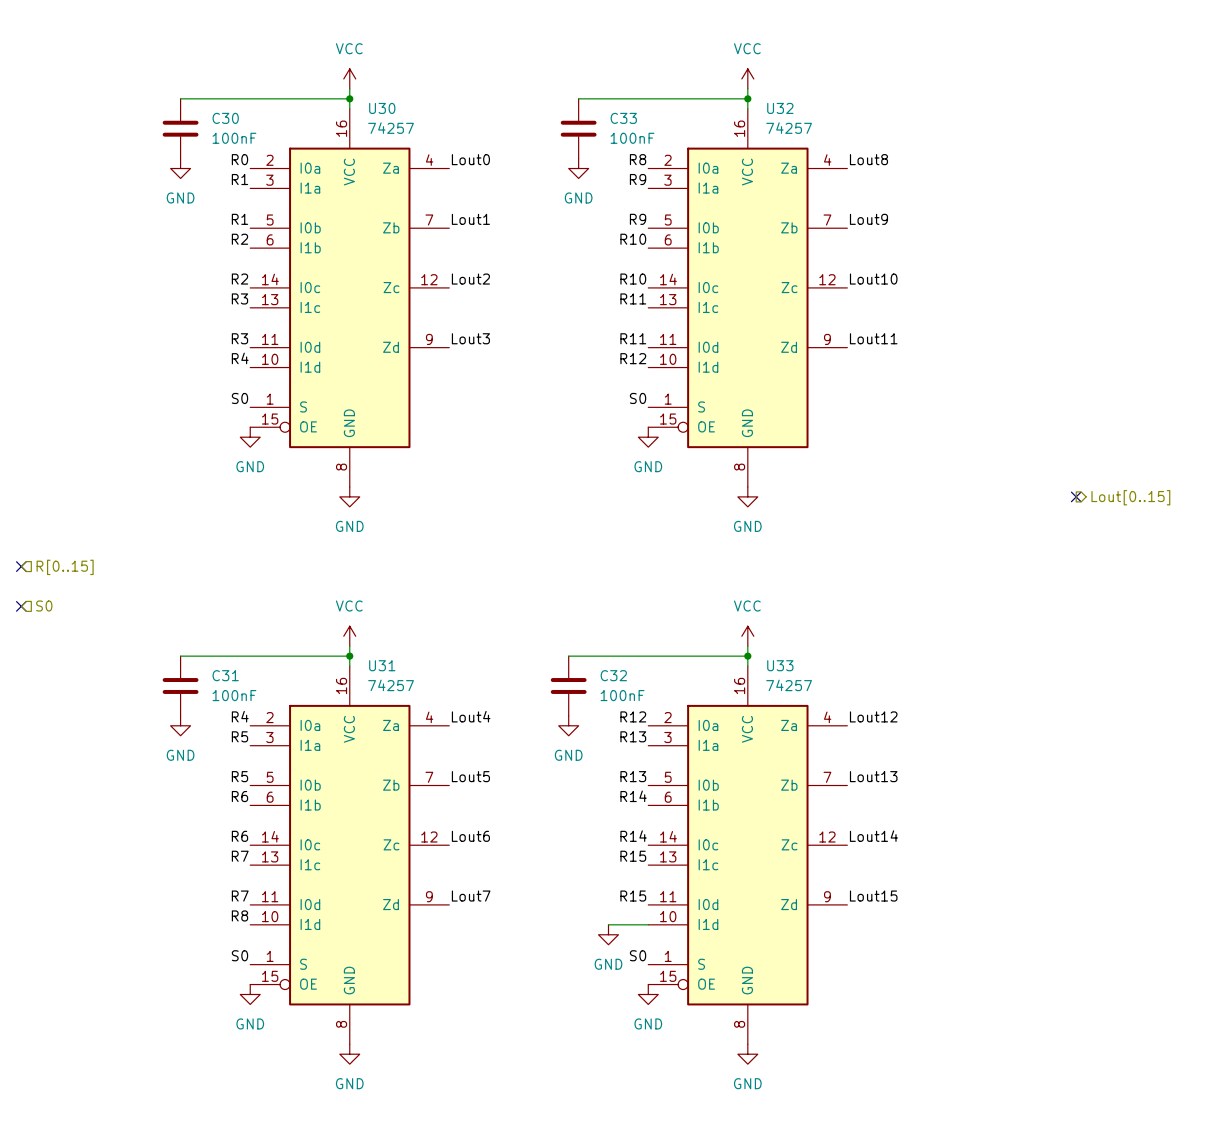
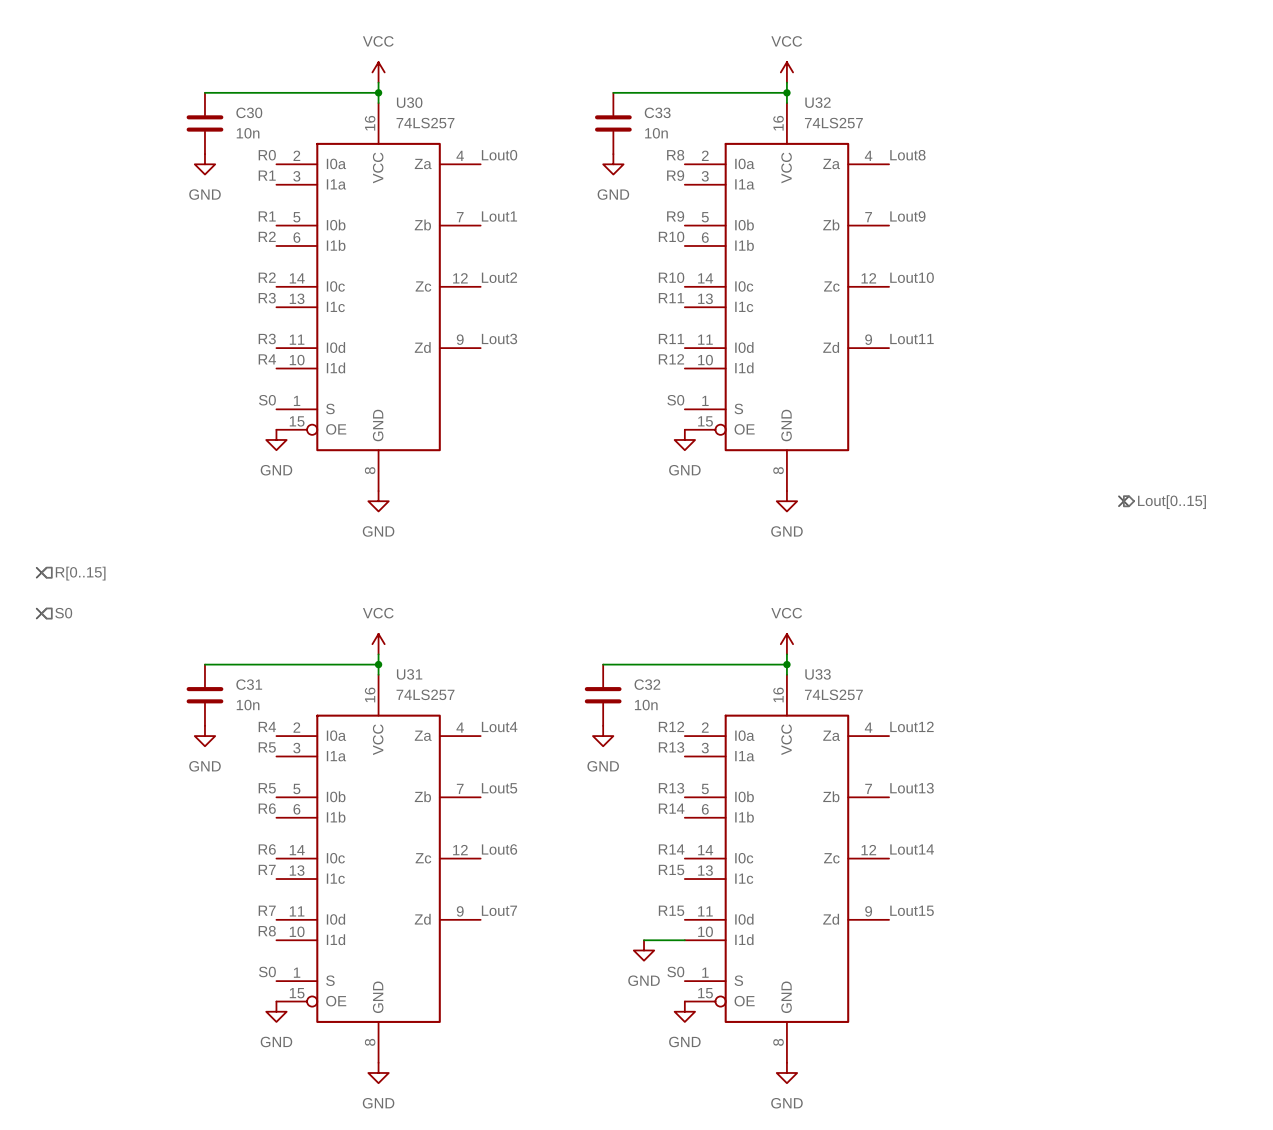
U30 value: 74257 (391, 128) -> 74LS257 (425, 123)
U32 value: 74257 (789, 128) -> 74LS257 (833, 123)
C30 value: 100nF (234, 138) -> 10n (248, 133)
C33 value: 100nF (632, 138) -> 10n (656, 133)
U31 value: 74257 (391, 685) -> 74LS257 (425, 694)
U33 value: 74257 (789, 685) -> 74LS257 (833, 694)
C31 value: 100nF (234, 695) -> 10n (248, 705)
C32 value: 100nF (622, 695) -> 10n (646, 705)

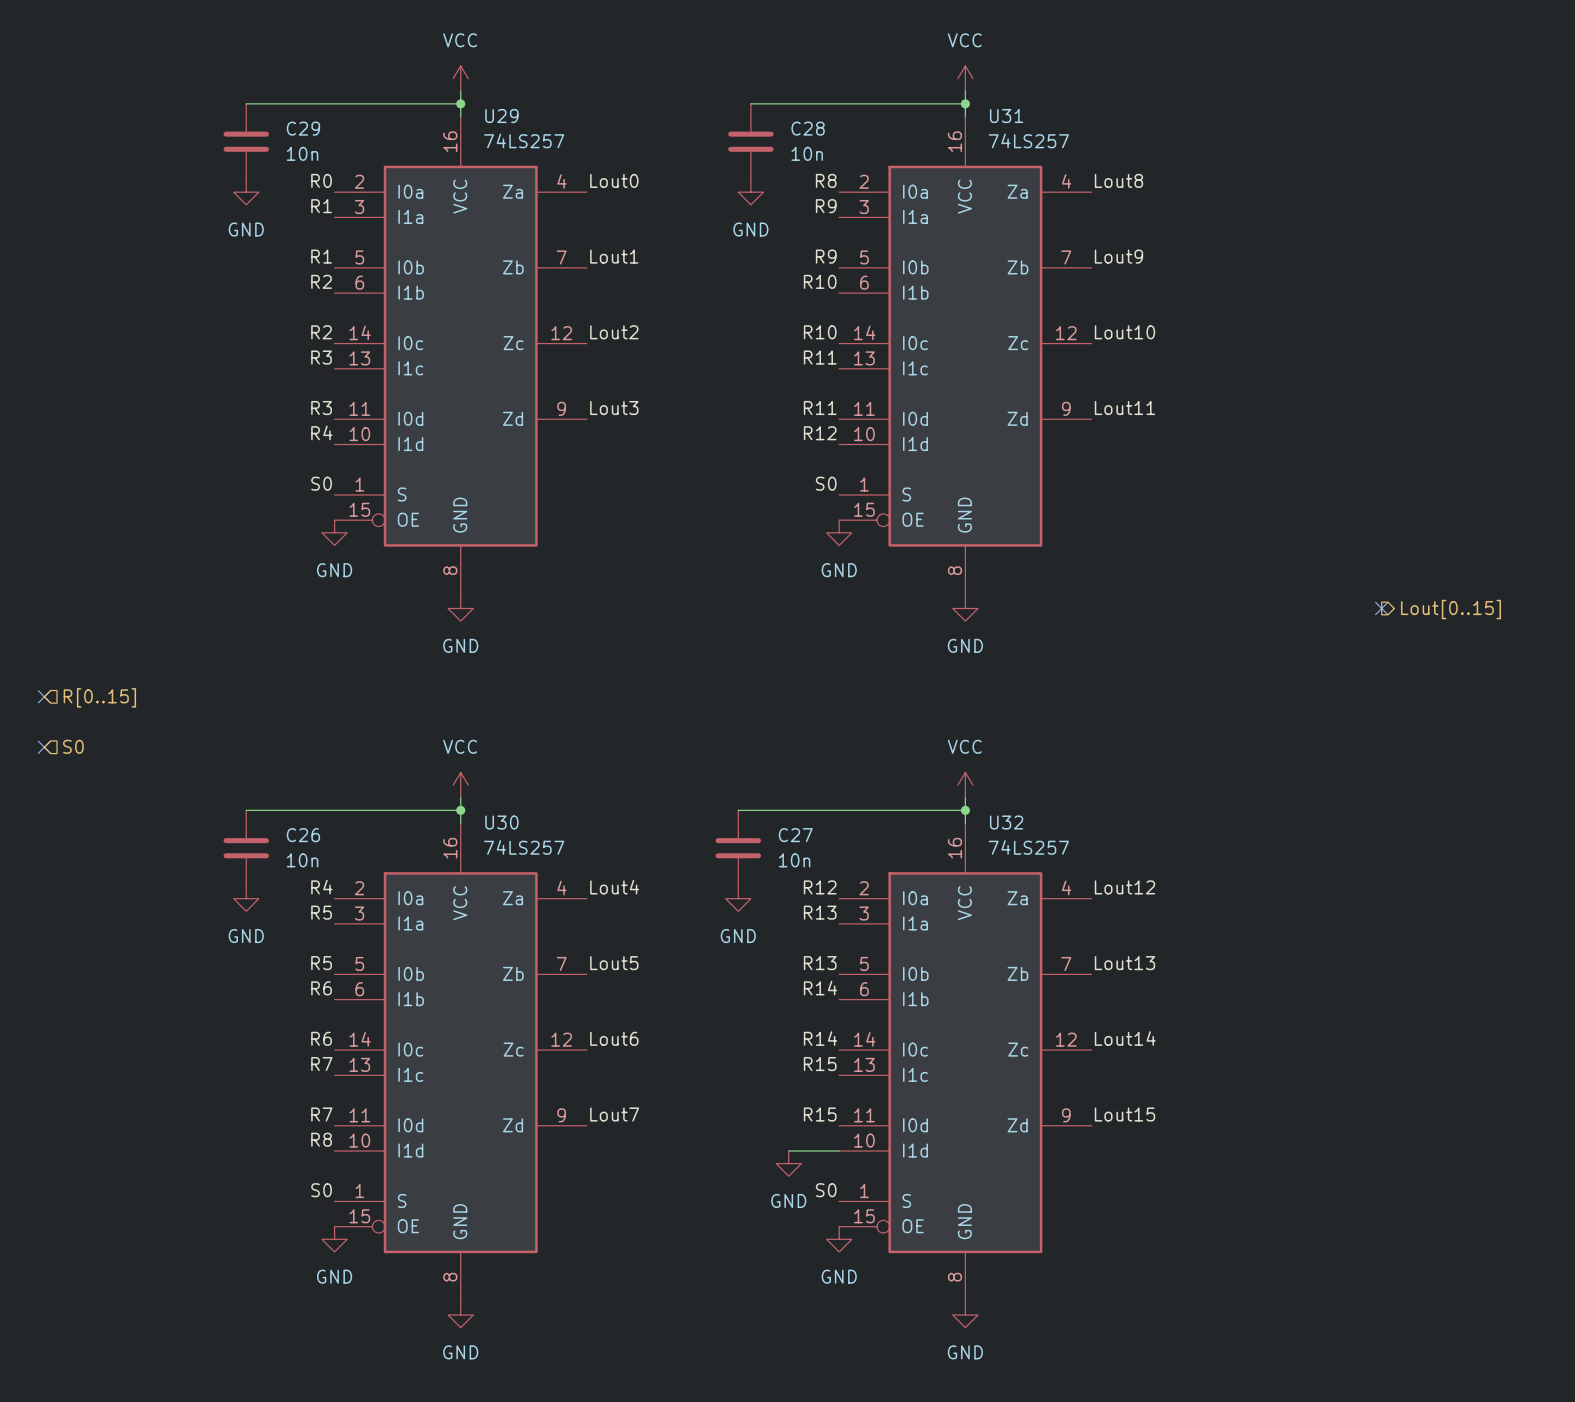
U30 name: U30 (409, 102) -> U29 (501, 116)
U32 name: U32 (817, 102) -> U31 (1006, 116)
C30 name: C30 (249, 112) -> C29 (303, 128)
C33 name: C33 (657, 112) -> C28 (808, 128)
U31 name: U31 (409, 674) -> U30 (501, 822)
U33 name: U33 (818, 674) -> U32 (1006, 822)
C31 name: C31 (249, 684) -> C26 (303, 835)
C32 name: C32 (647, 684) -> C27 (795, 835)

